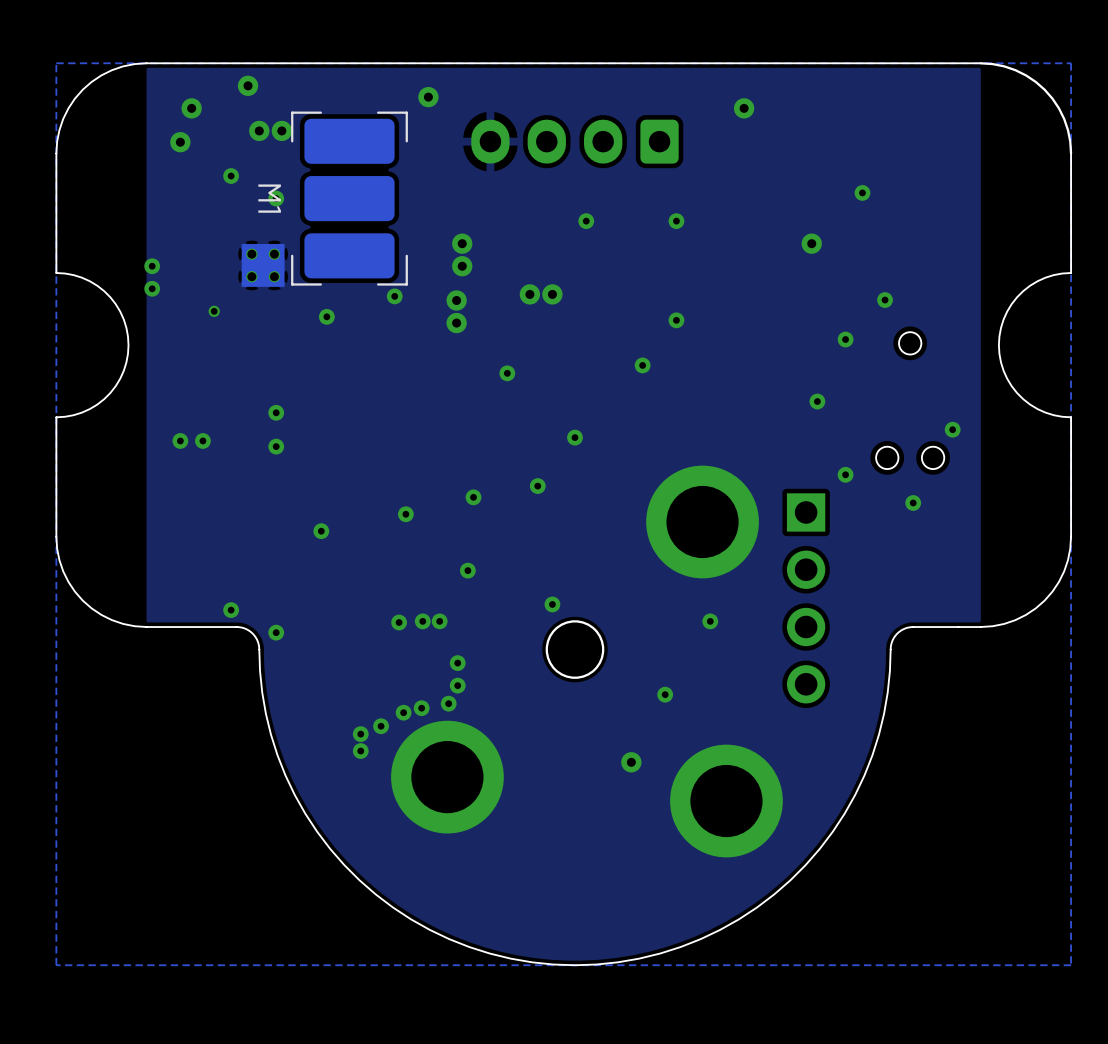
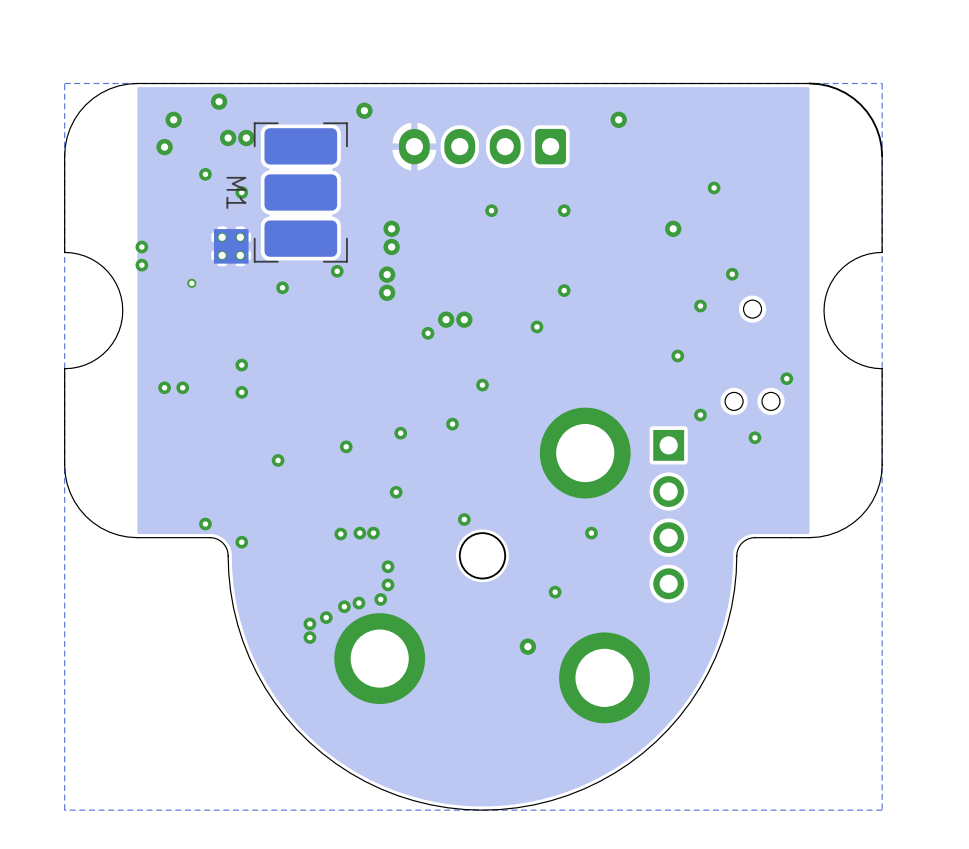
via: (529, 294) -> none
via: (552, 294) -> none
via: none -> (446, 319)
via: none -> (464, 319)

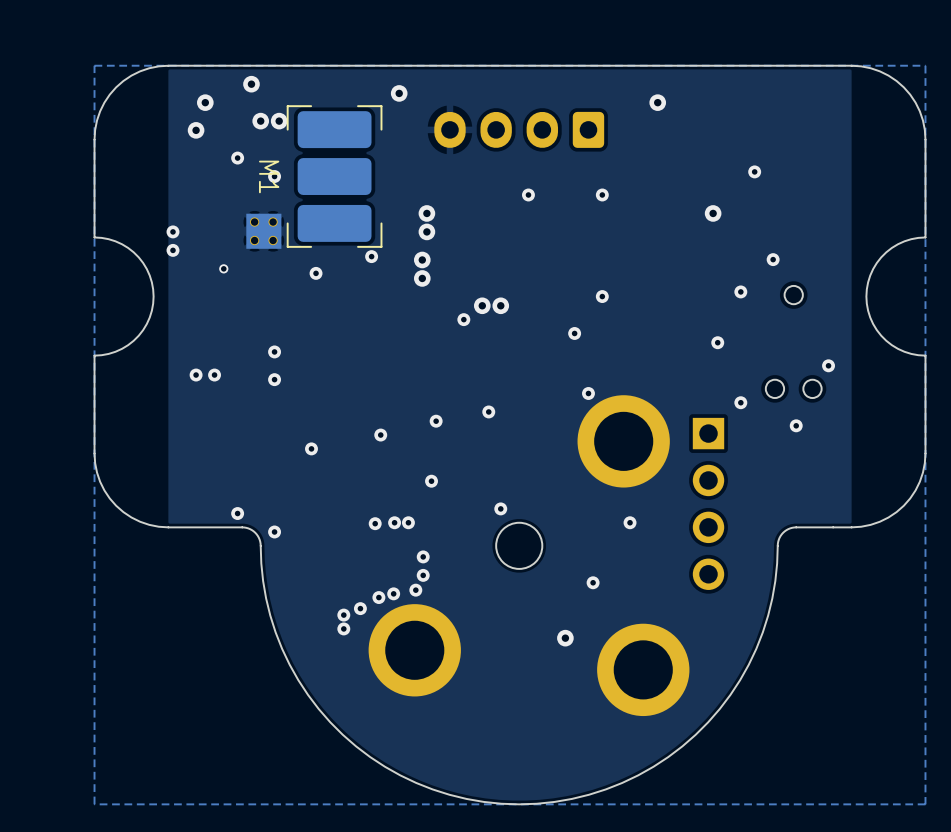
via: (564, 290) -> none
via: none -> (602, 296)
via: (536, 326) -> none
via: none -> (574, 333)
via: (482, 385) -> none
via: none -> (588, 393)

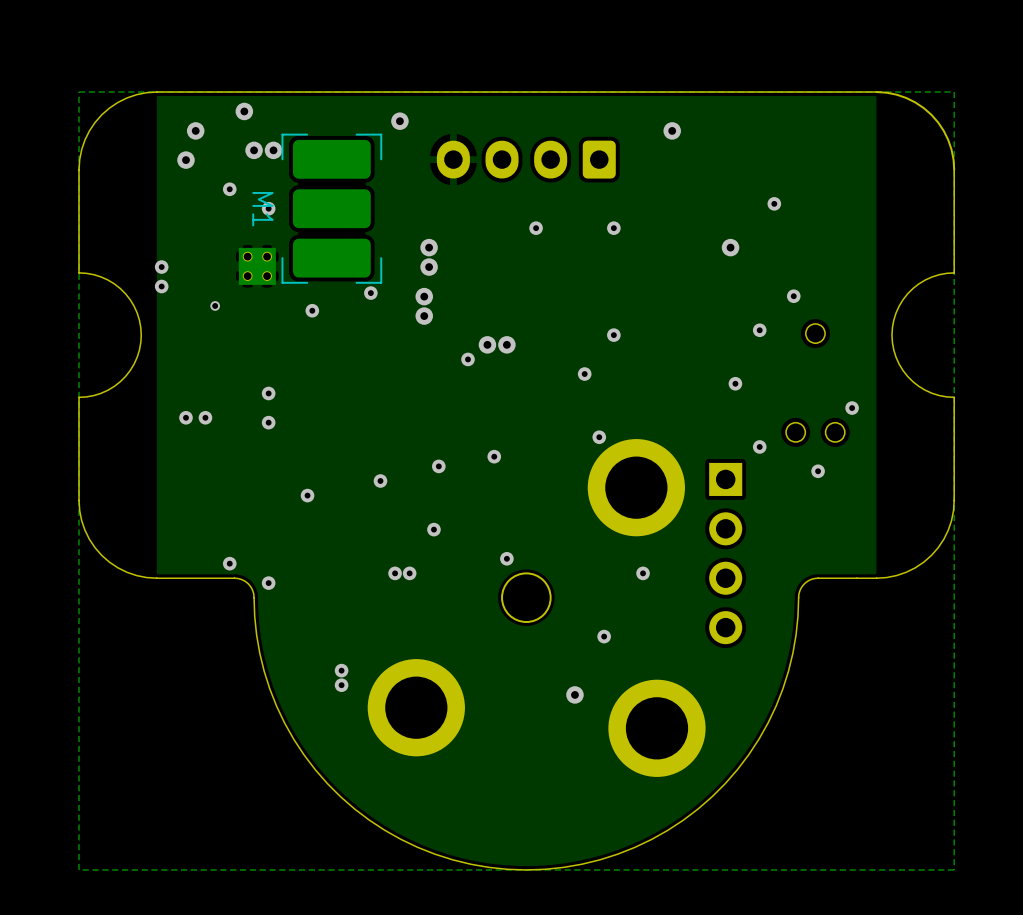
via: (375, 523) -> none
via: (423, 556) -> none
via: (423, 575) -> none
via: (415, 590) -> none
via: (393, 593) -> none
via: (378, 597) -> none
via: (360, 608) -> none

